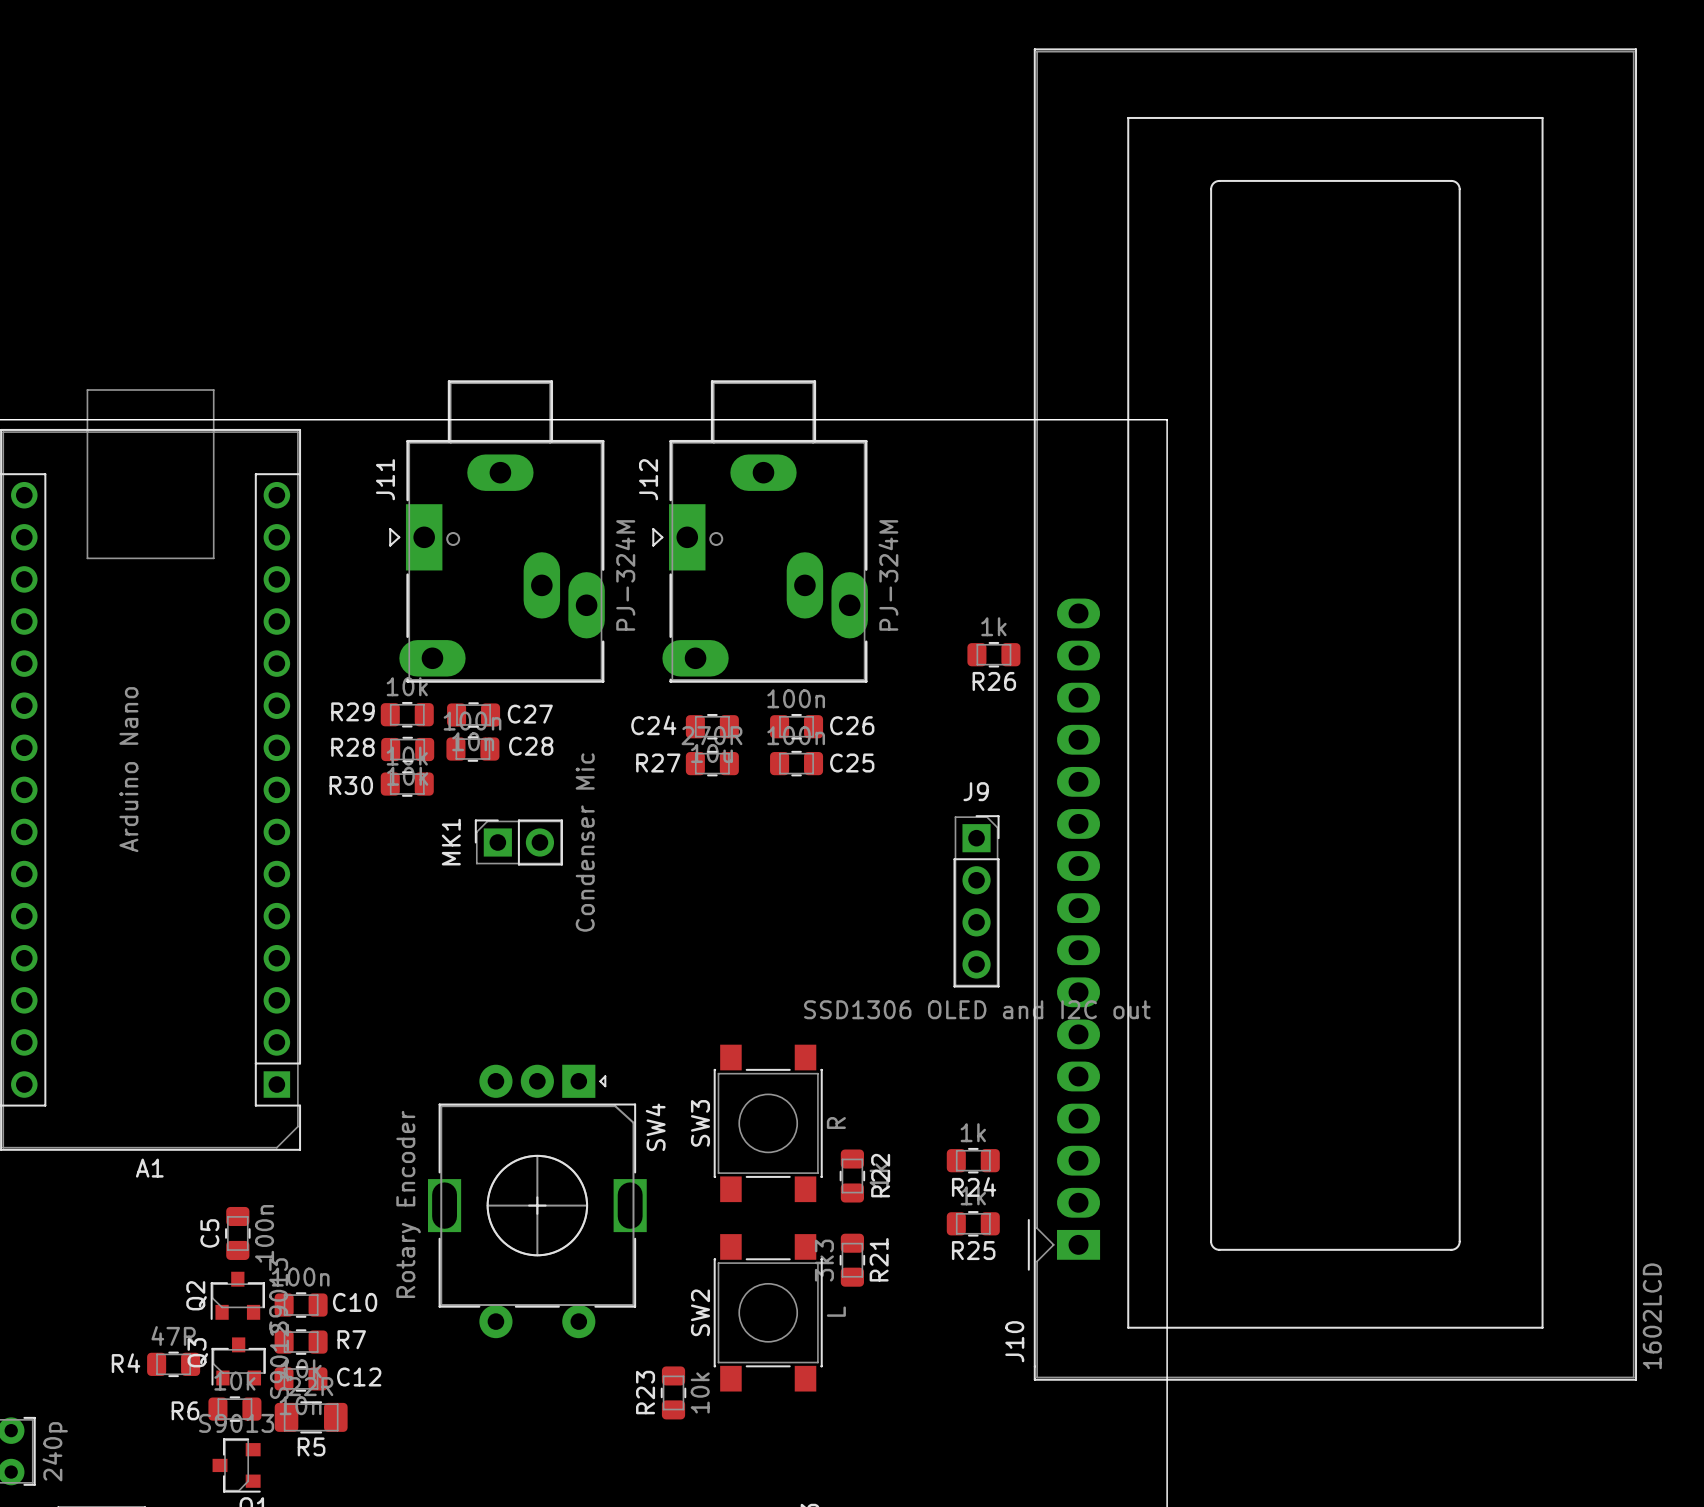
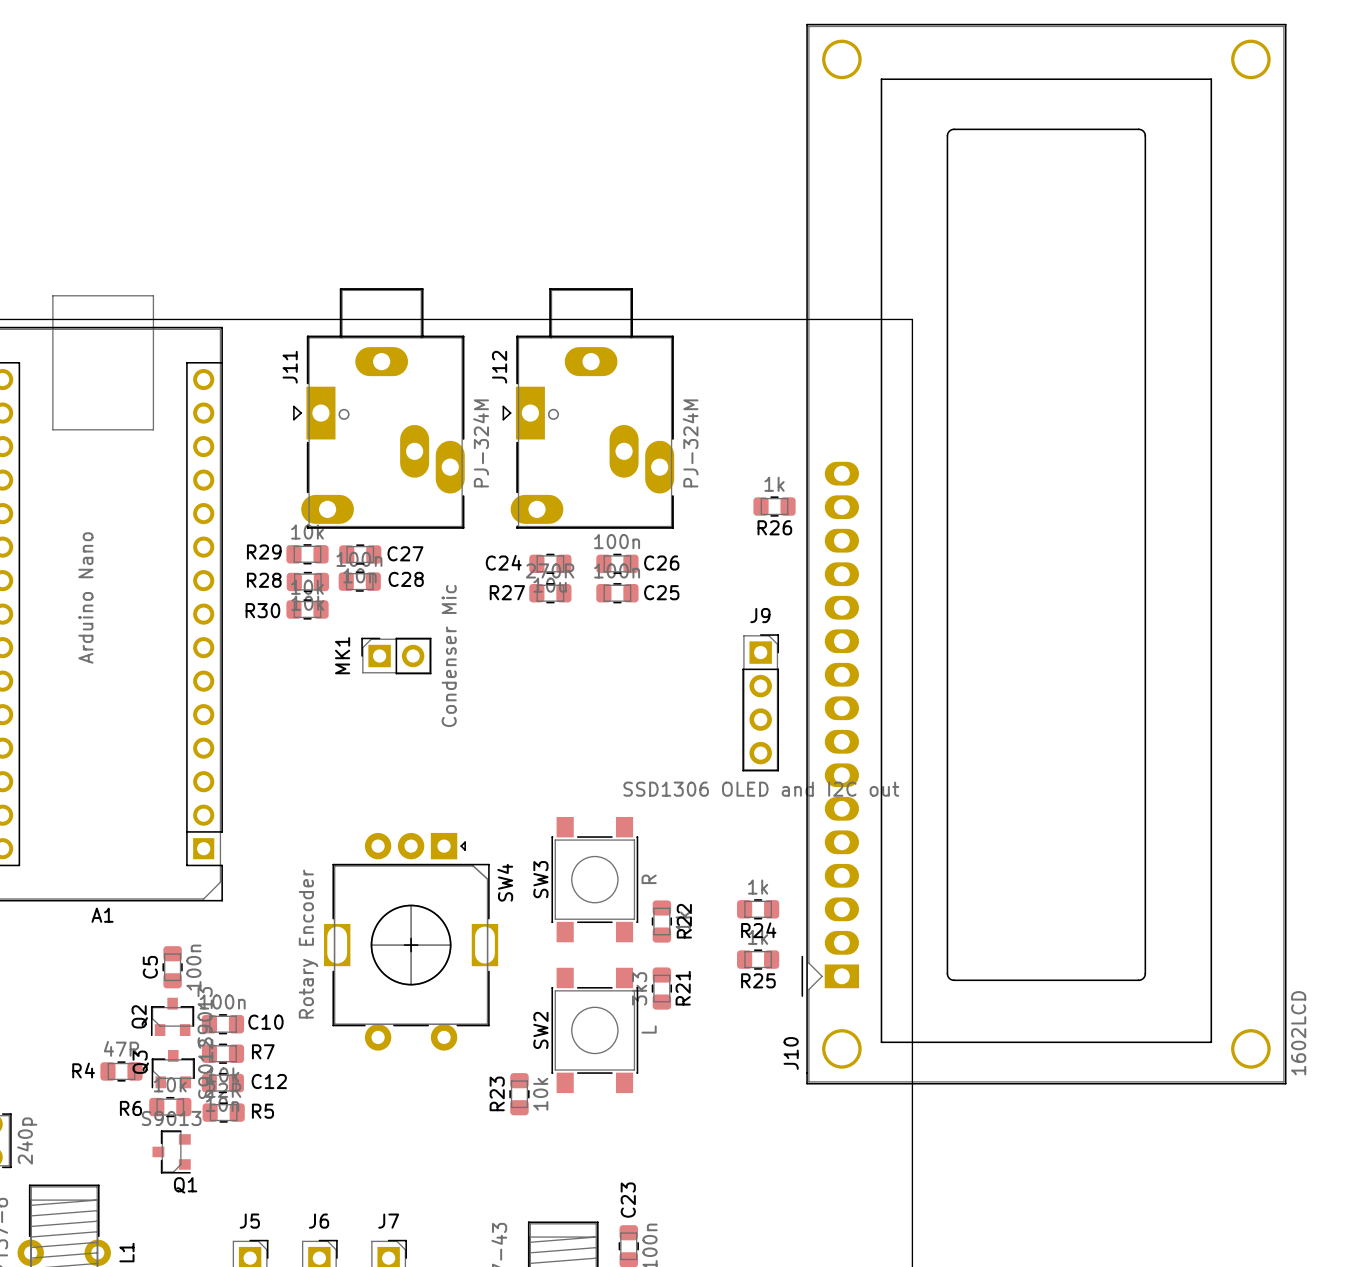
J10 footprint: [1027, 48, 1638, 1381] -> [801, 23, 1287, 1085]
R5 footprint: [274, 1401, 348, 1434] -> [202, 1102, 245, 1123]
R5 name position: R5 (311, 1446) -> R5 (262, 1111)

